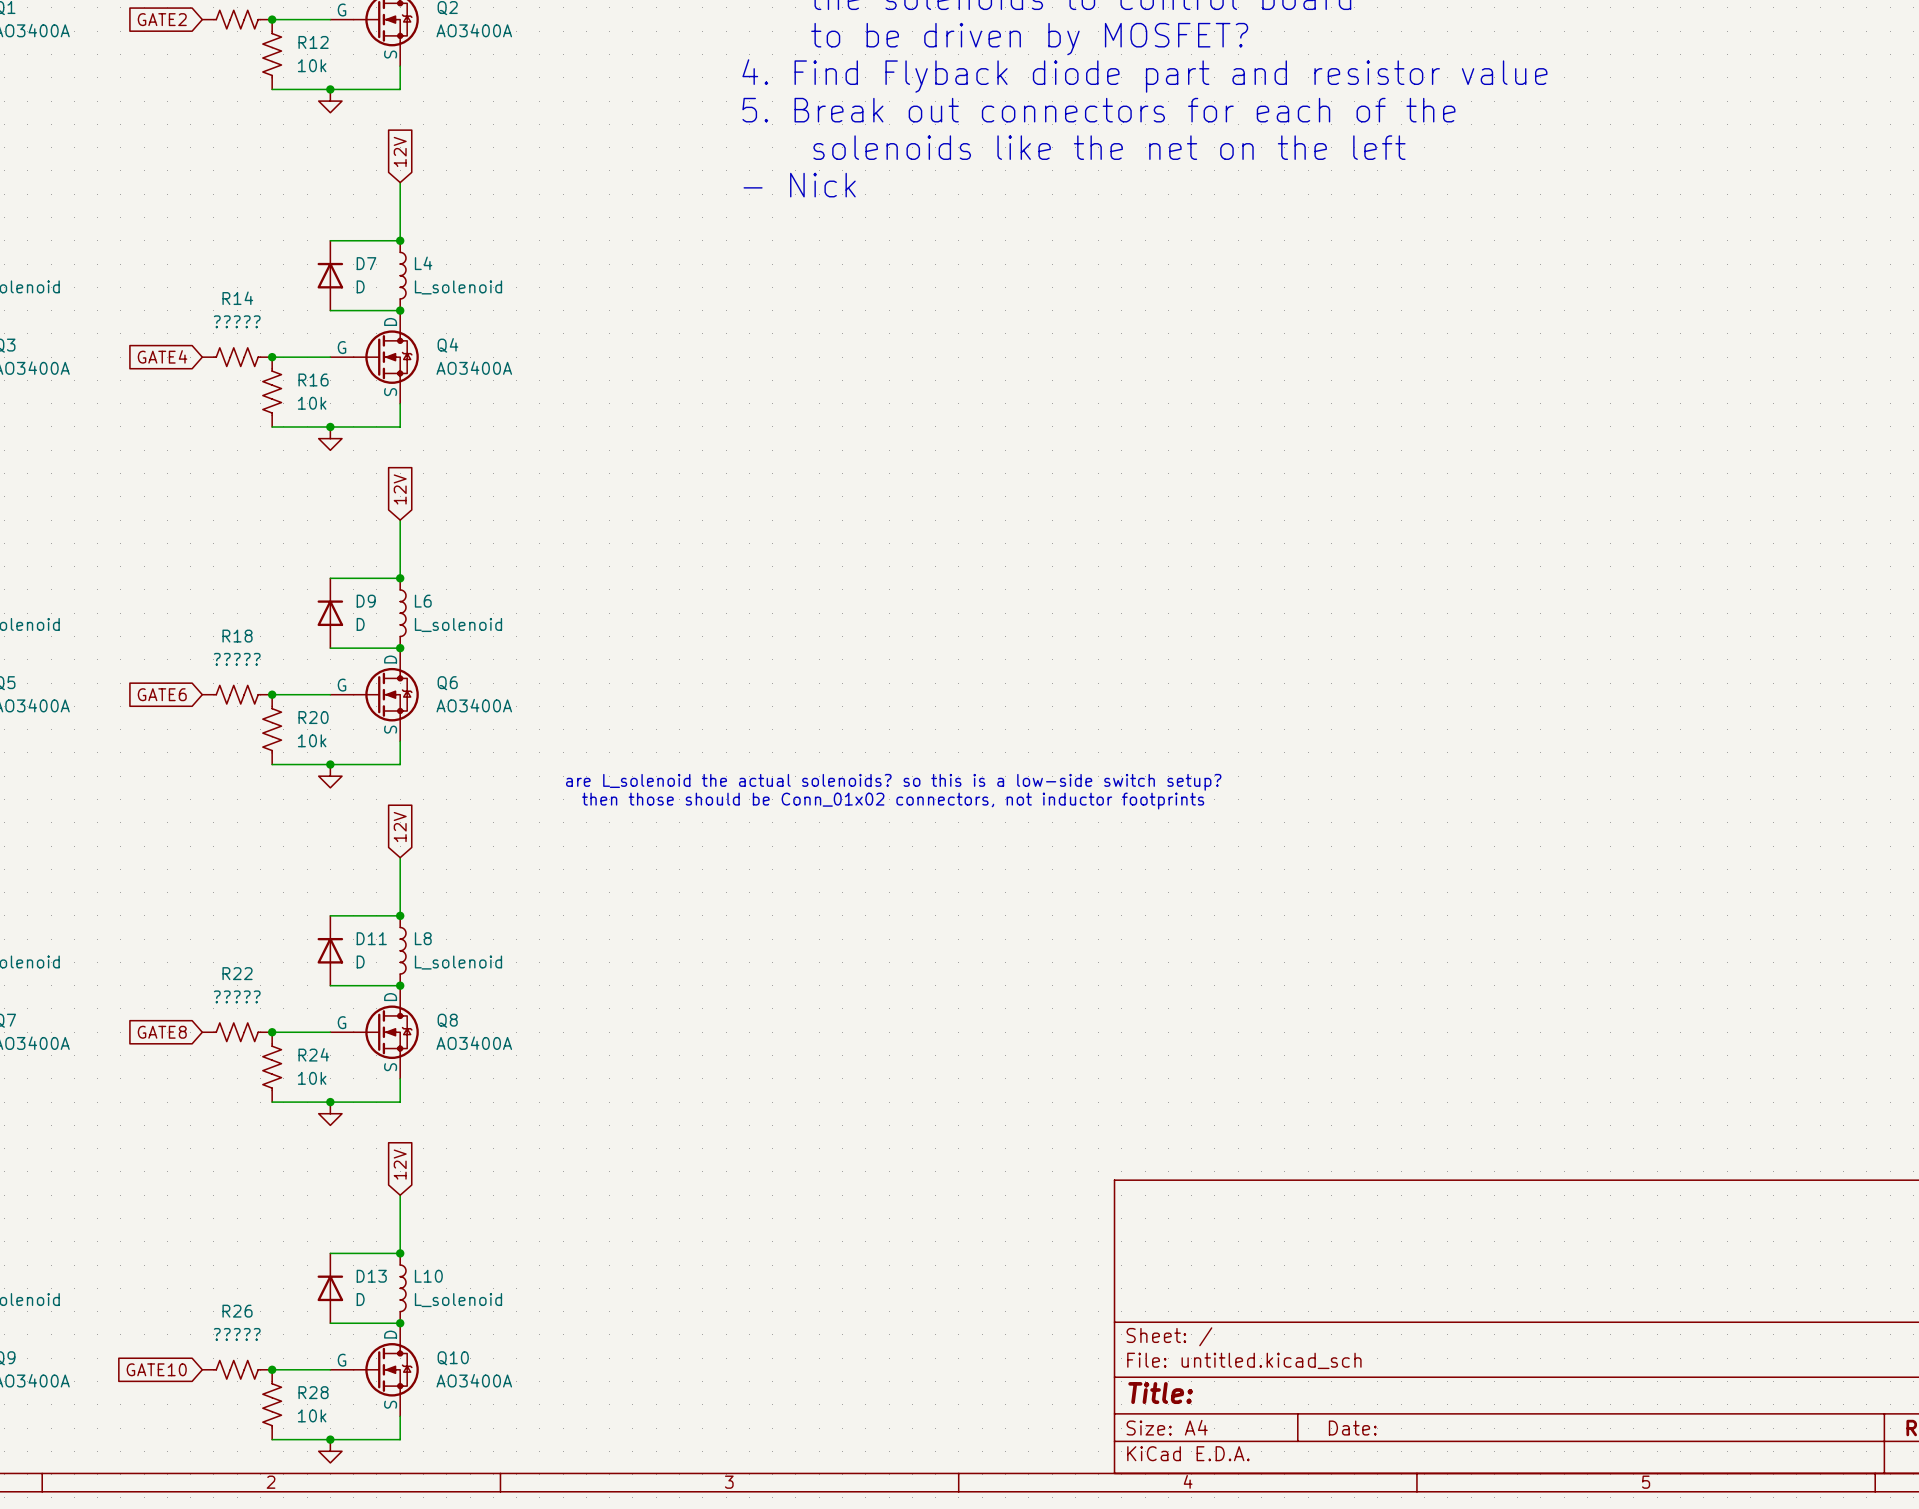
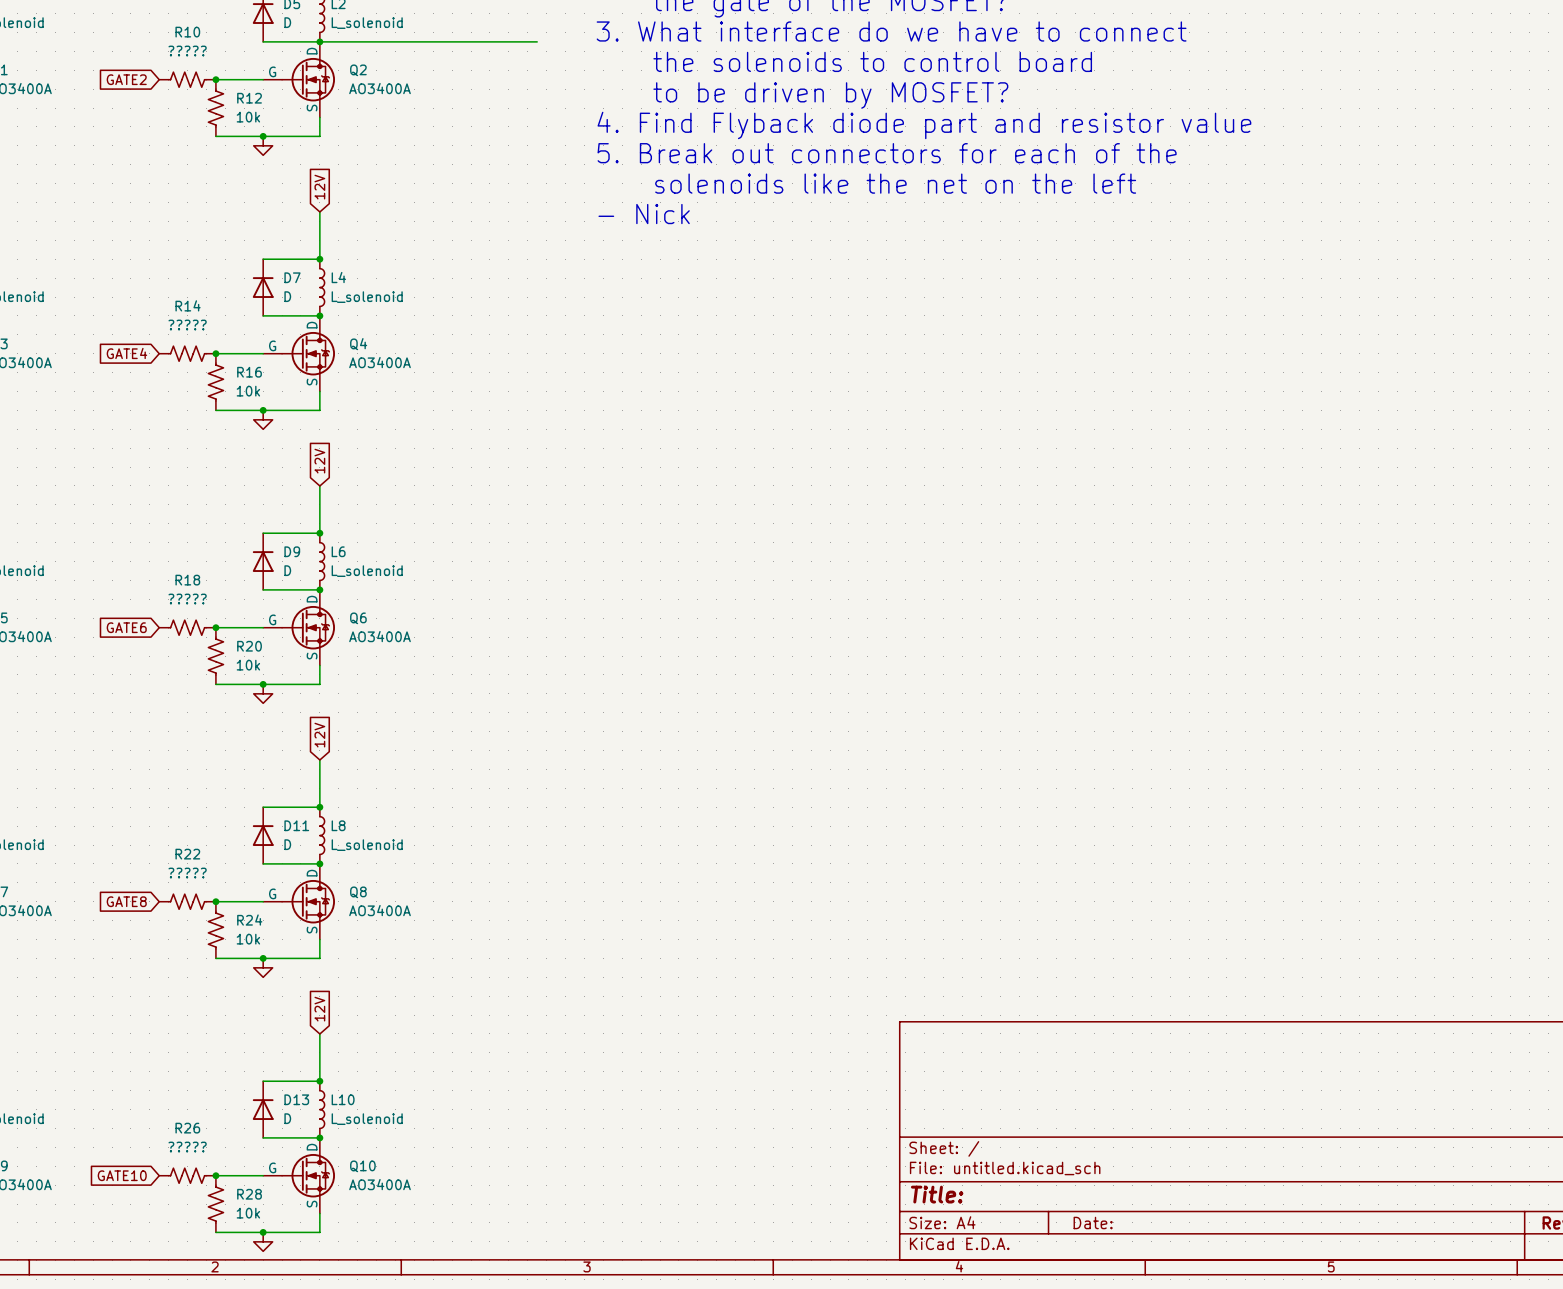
text: are L_solenoid the actual solenoids? so this is a low-side switch setup? (893, 782) -> none
text: then those should be Conn_01x02 connectors, not inductor footprints (893, 801) -> none

